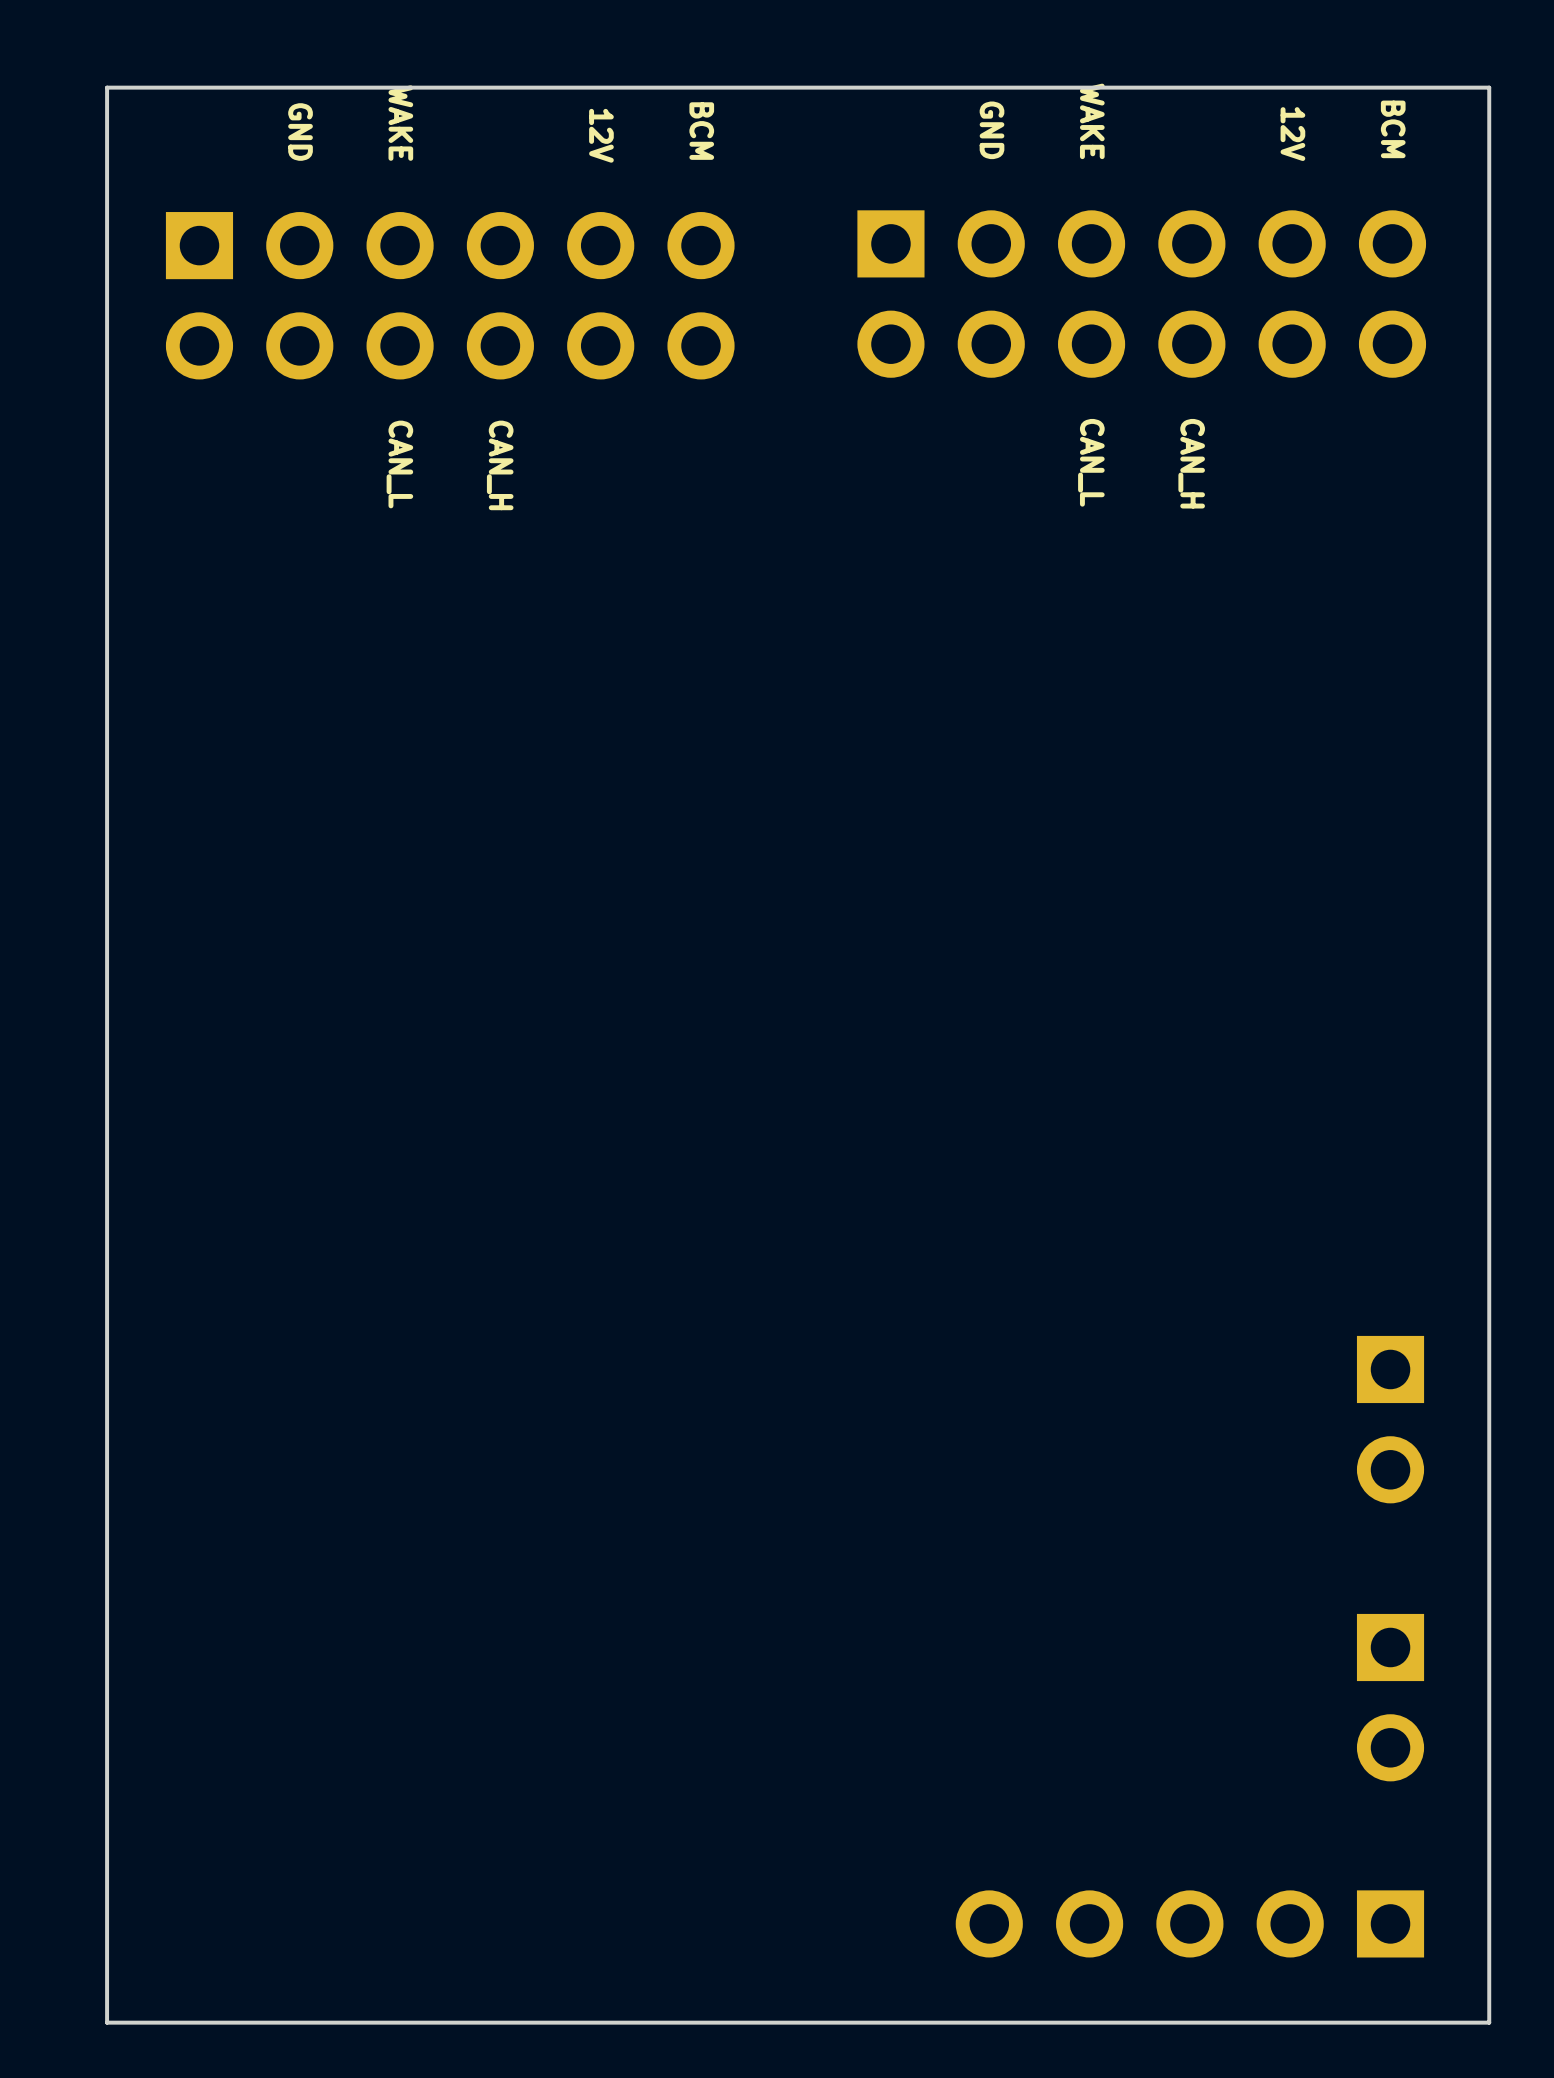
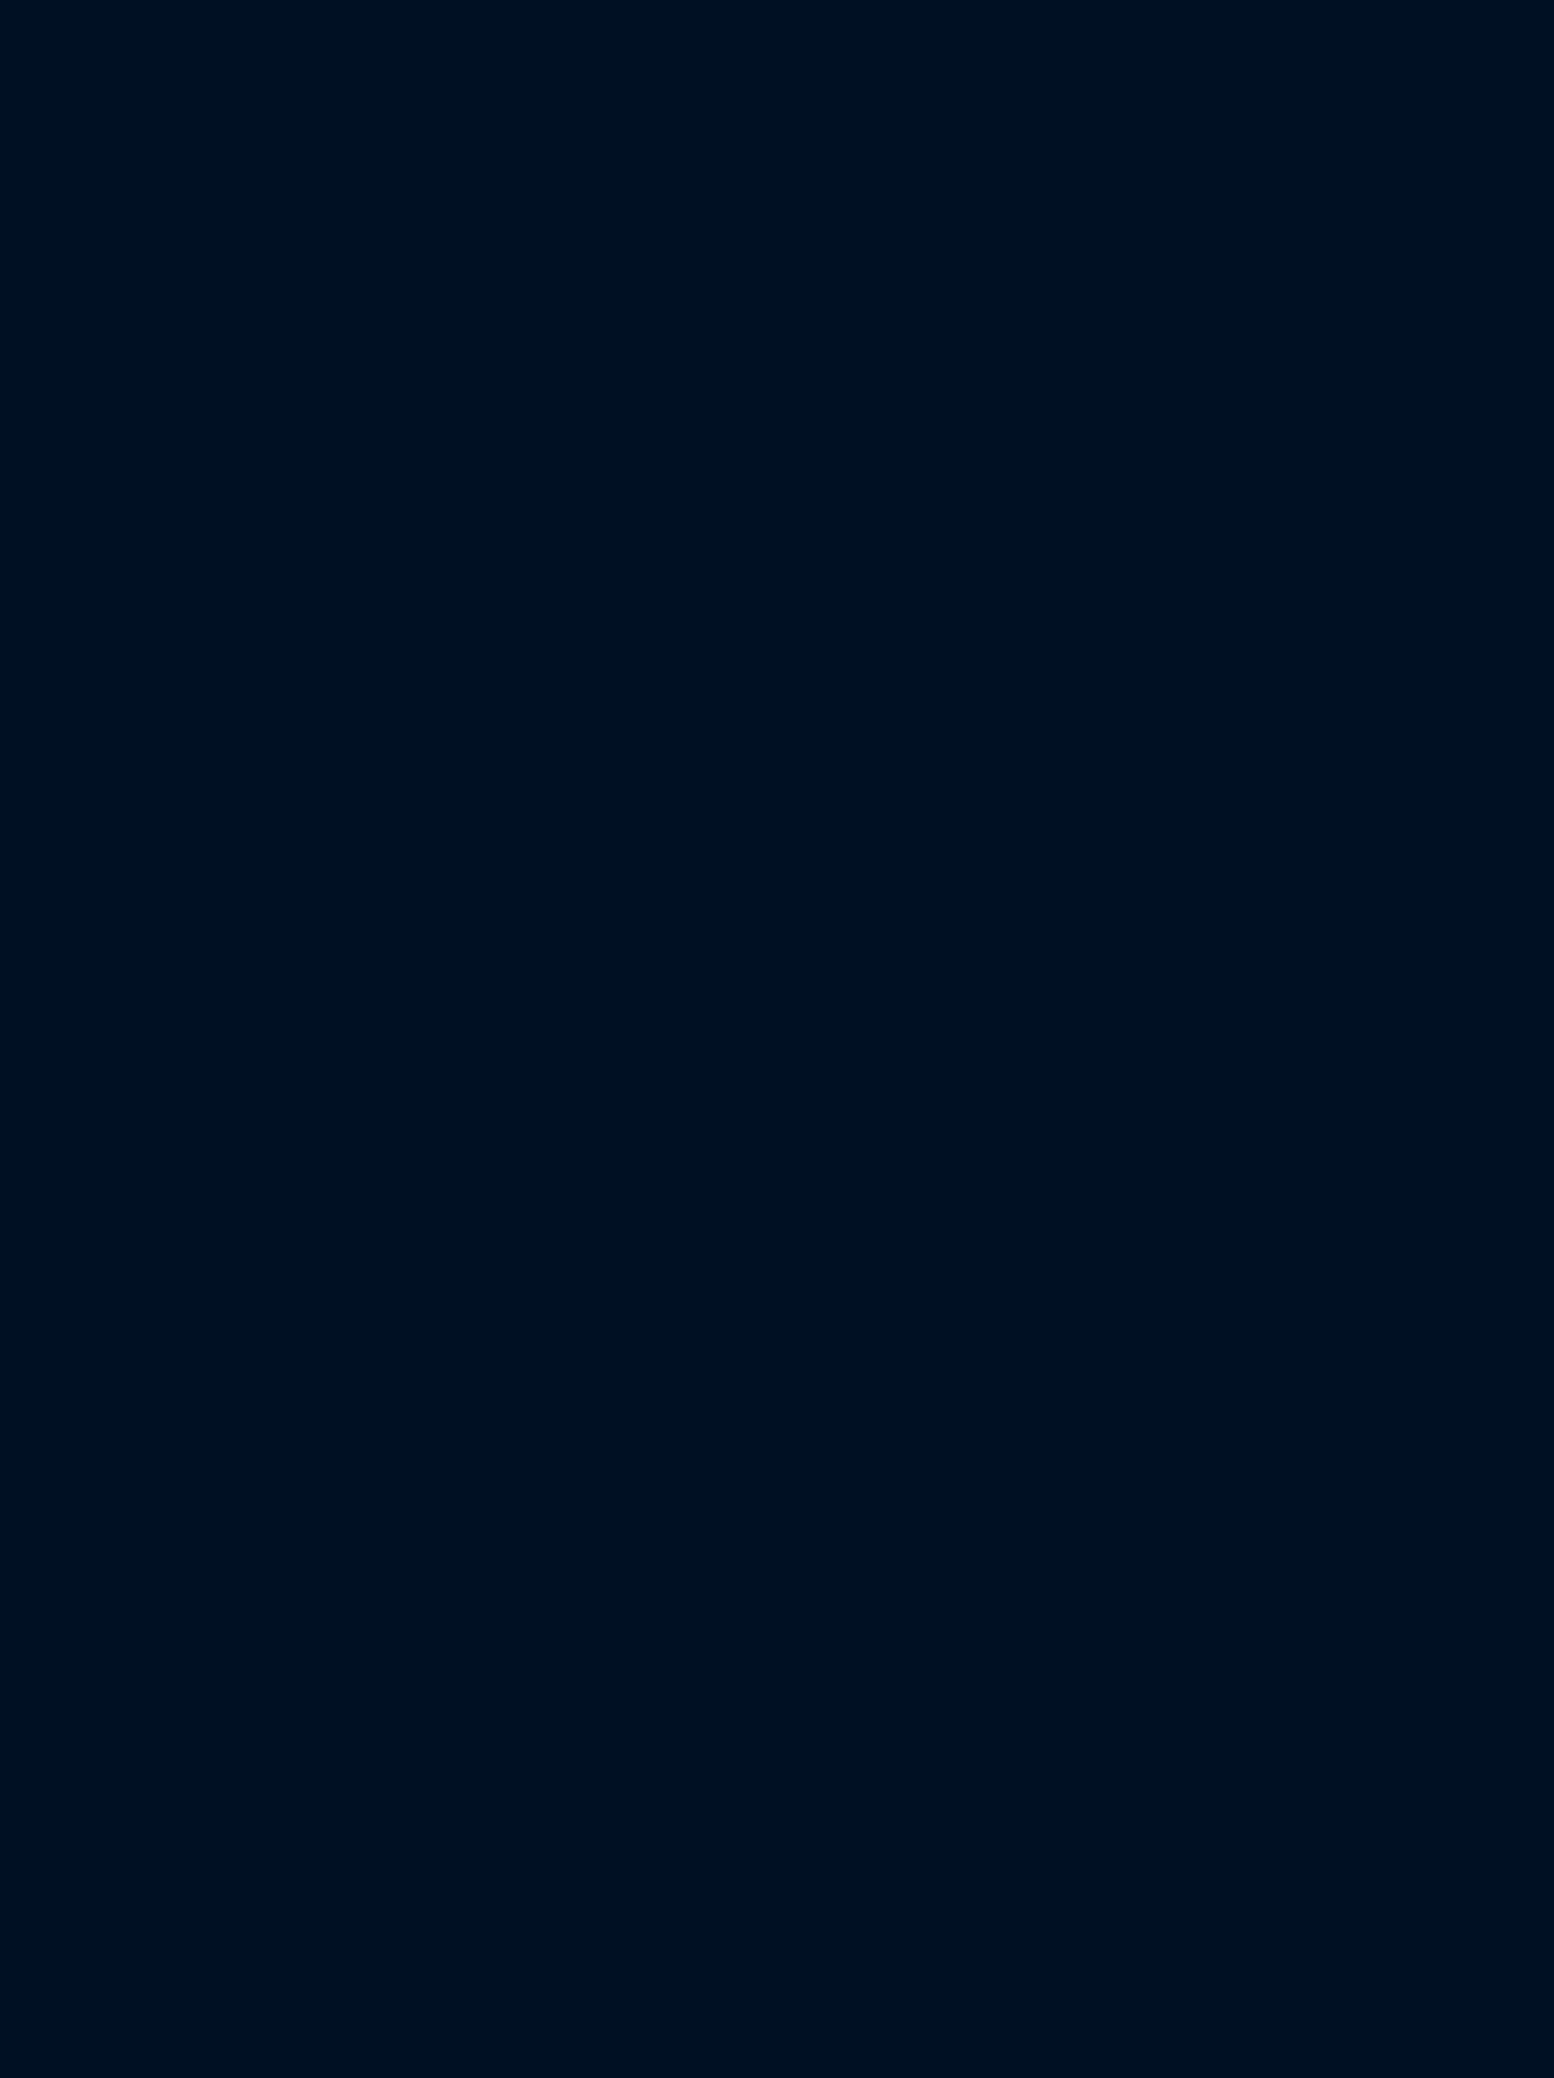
board edge: (1489, 87) (1489, 2022) (107, 2022) (107, 87) (1489, 87) -> none
part: (1141, 294) -> none
part: (450, 295) -> none
part: (1390, 1419) -> none
part: (1390, 1697) -> none
part: (1189, 1923) -> none

